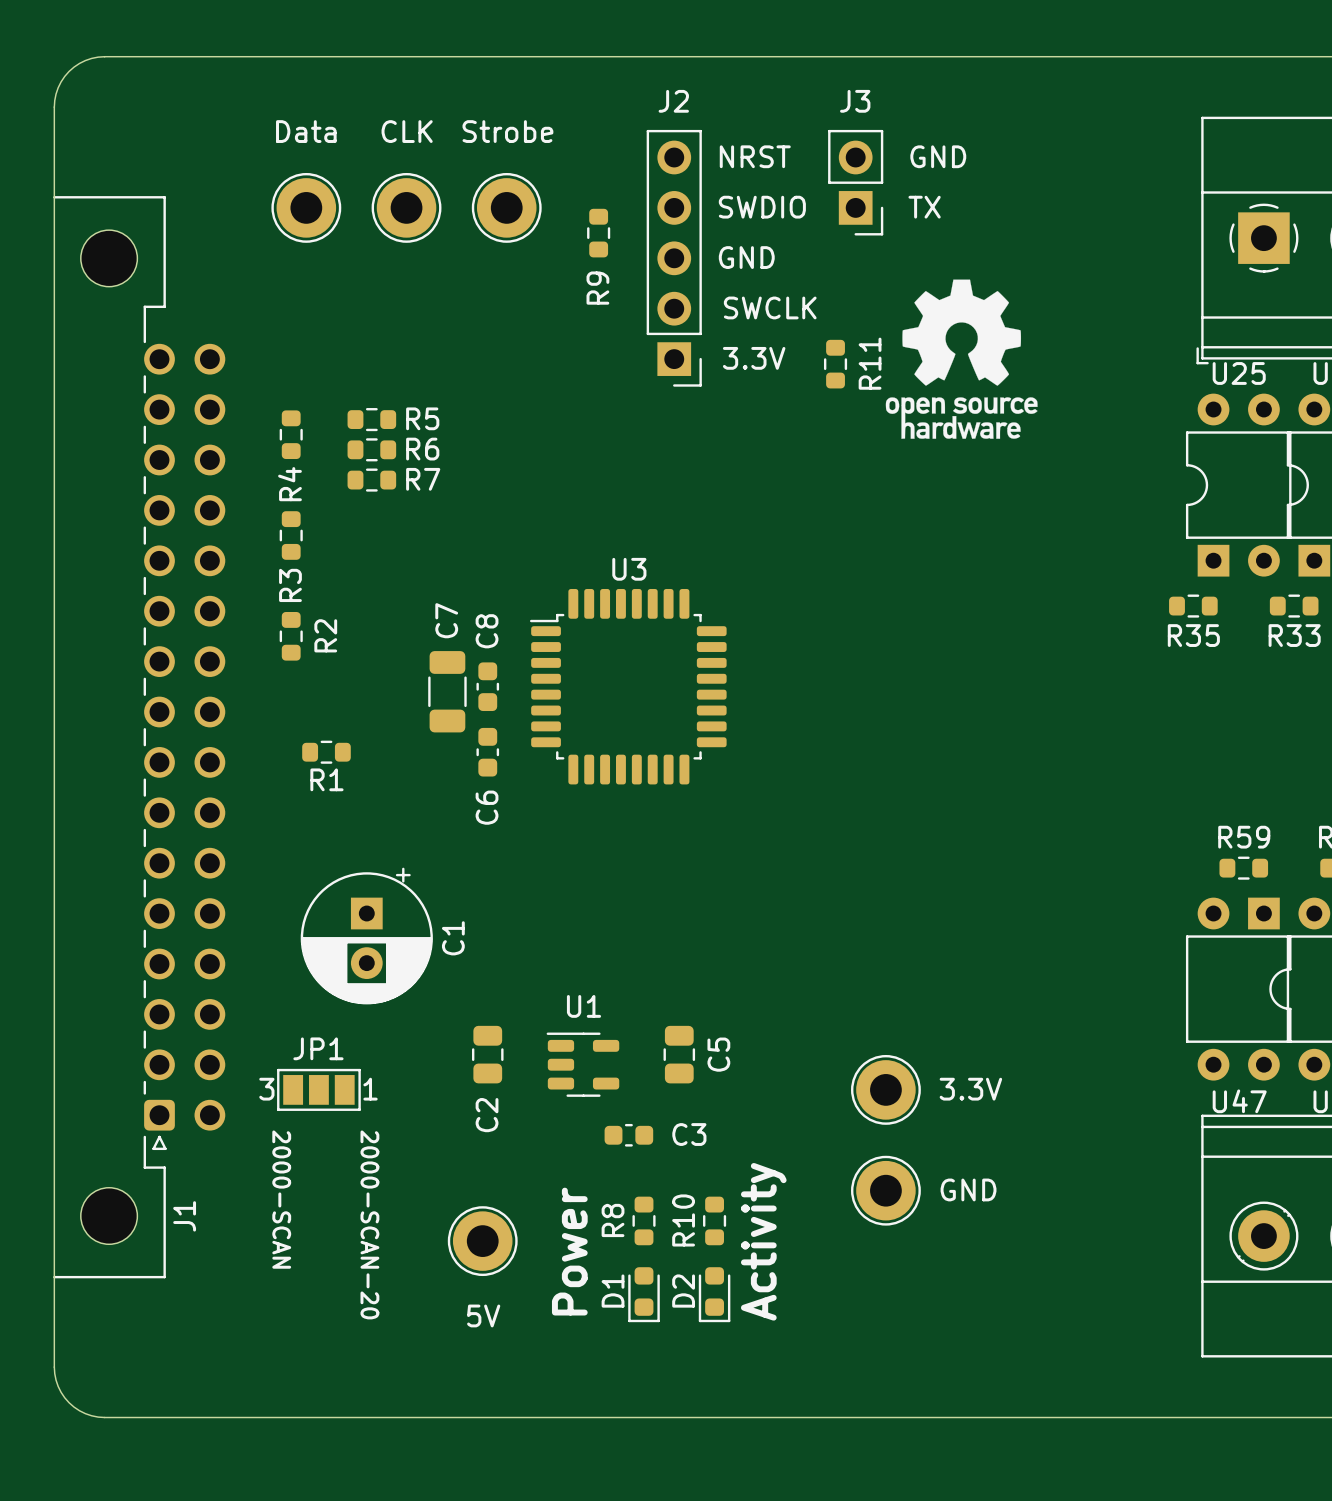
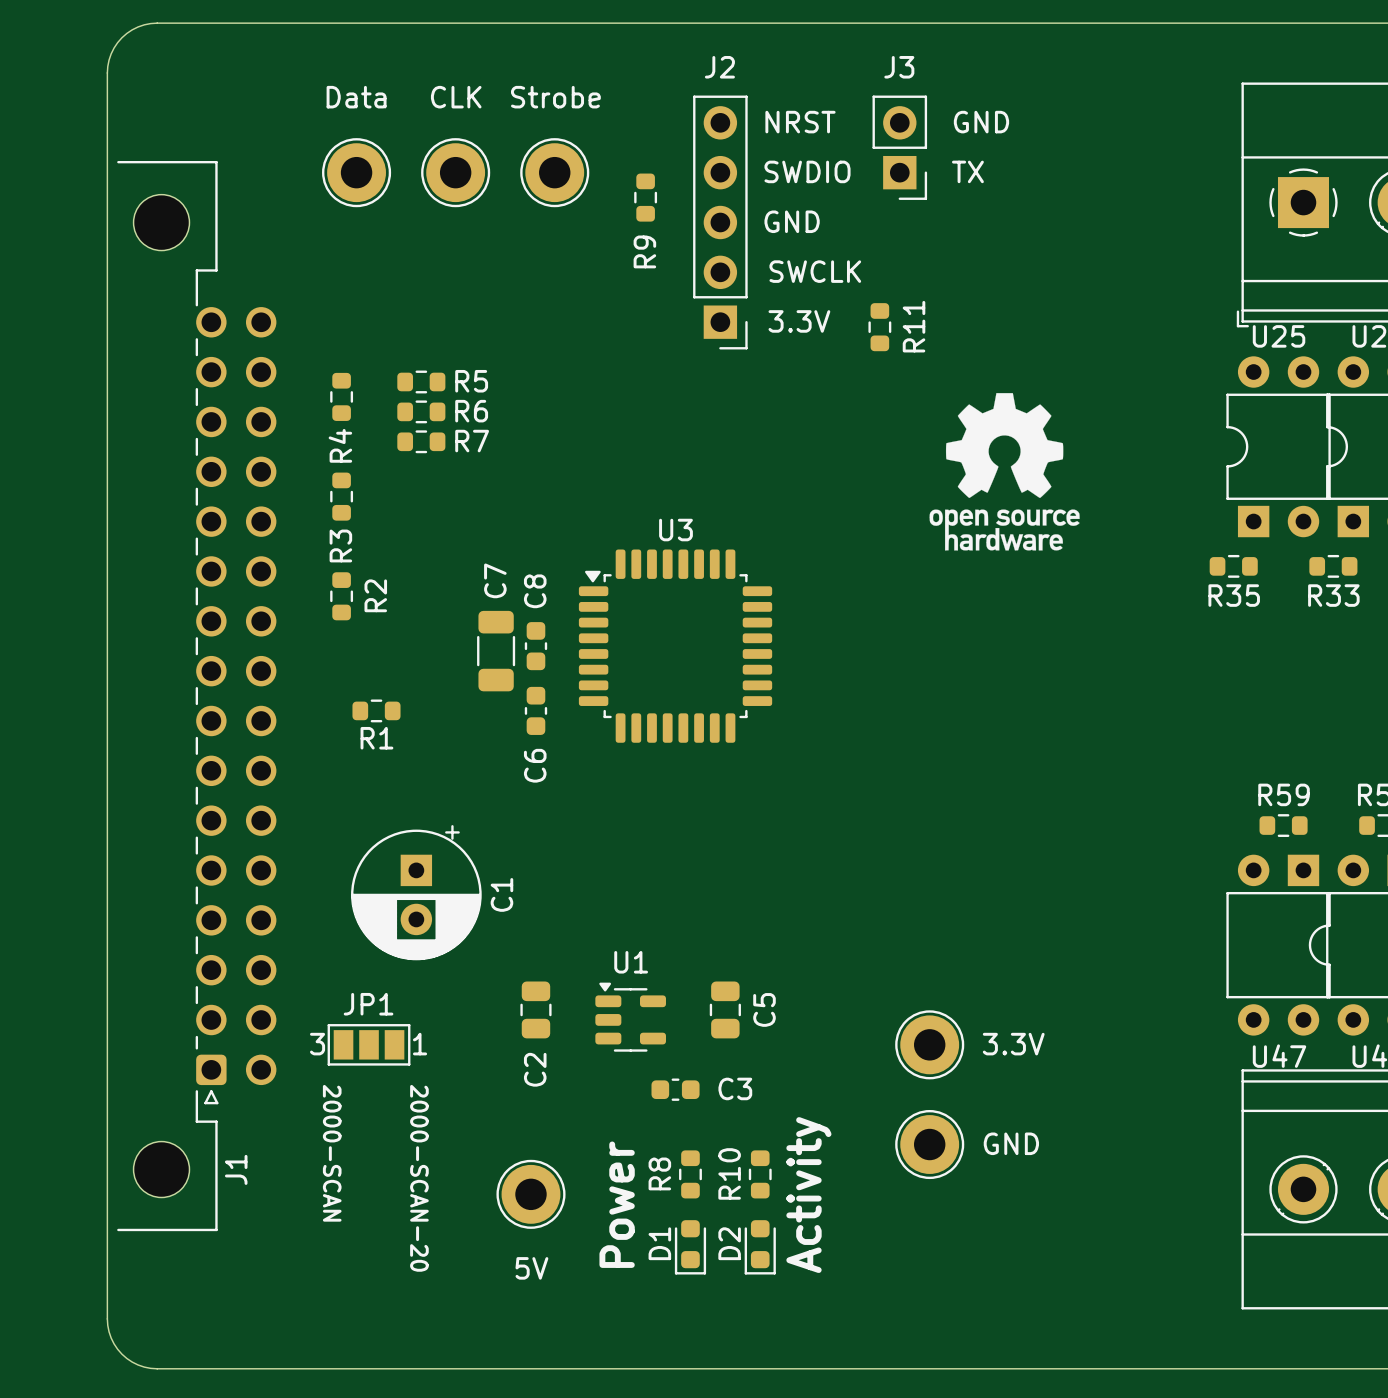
J1 footprint: [53, 196, 226, 1279] -> [117, 160, 277, 1232]
drawing position: (961, 359) -> (1004, 471)
U3 footprint: [529, 588, 727, 785] -> [578, 549, 773, 743]
U1 footprint: [546, 1032, 620, 1097] -> [595, 982, 666, 1052]

